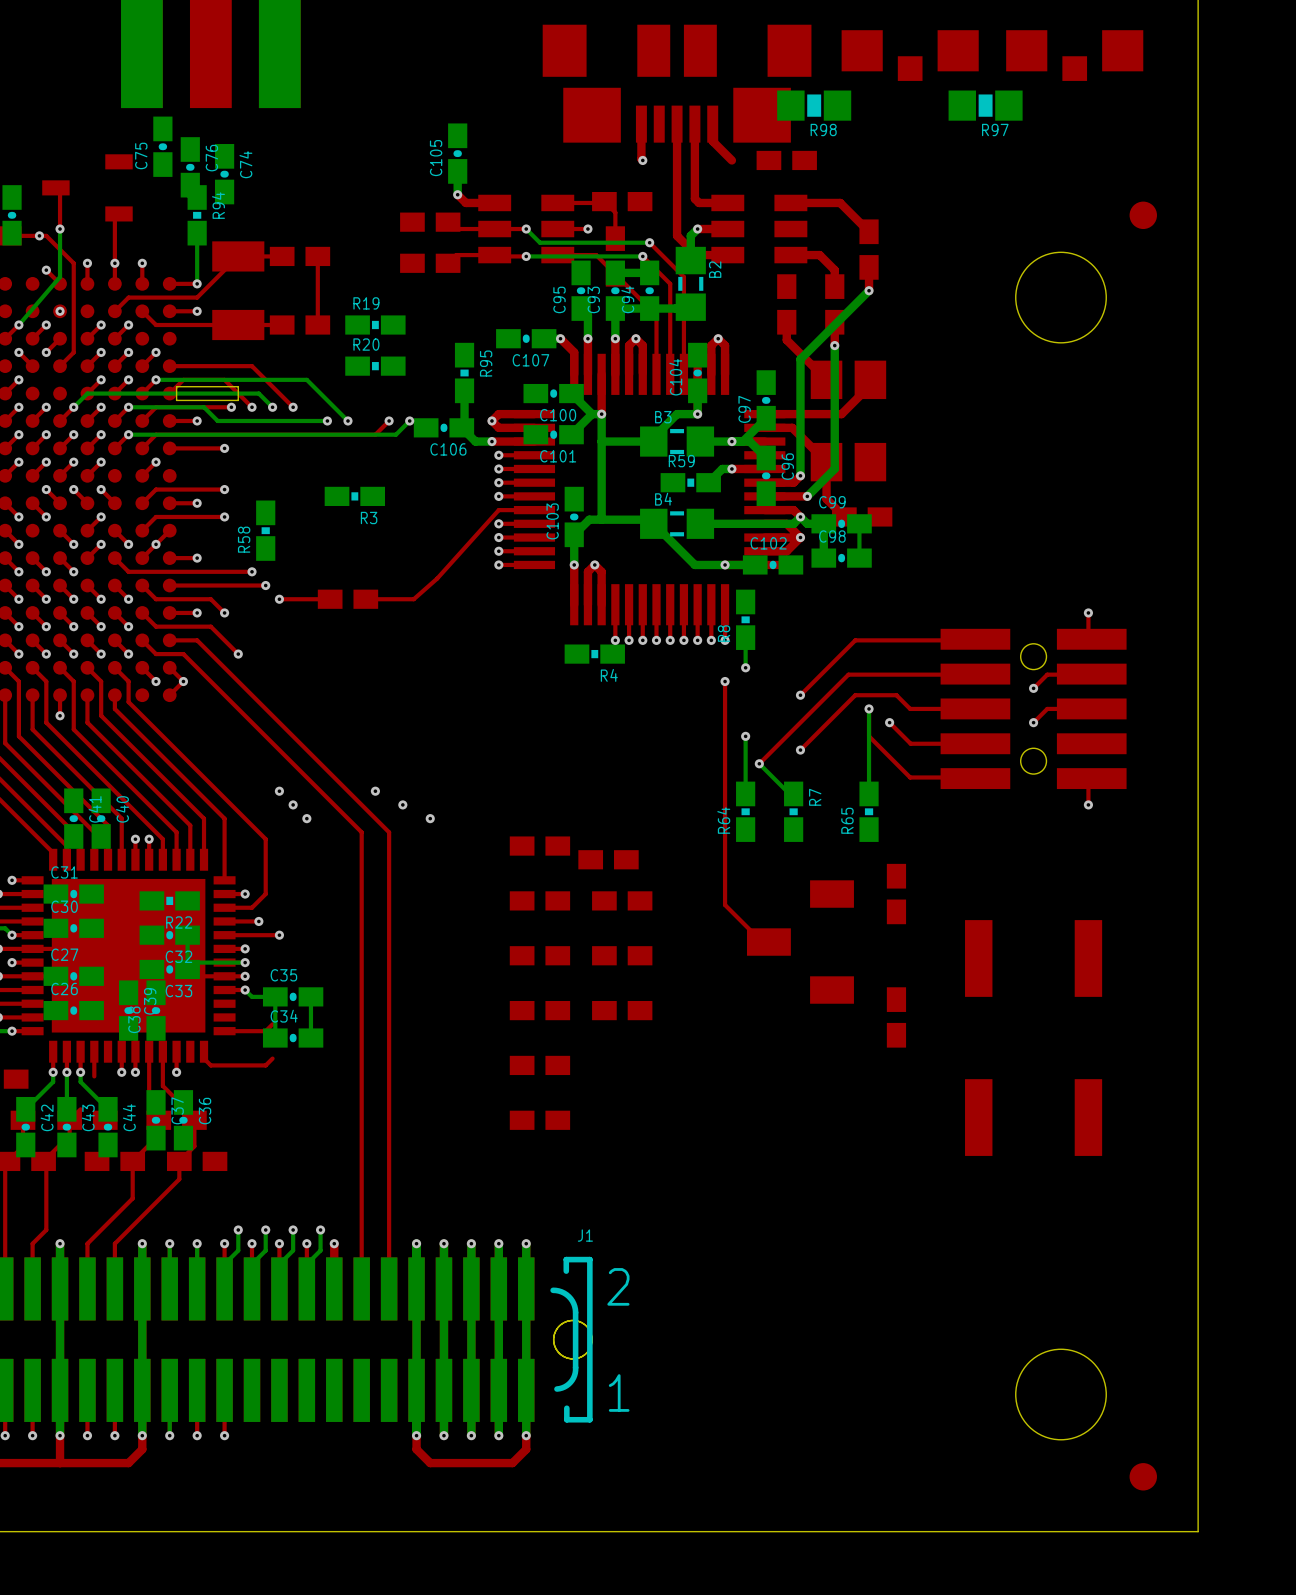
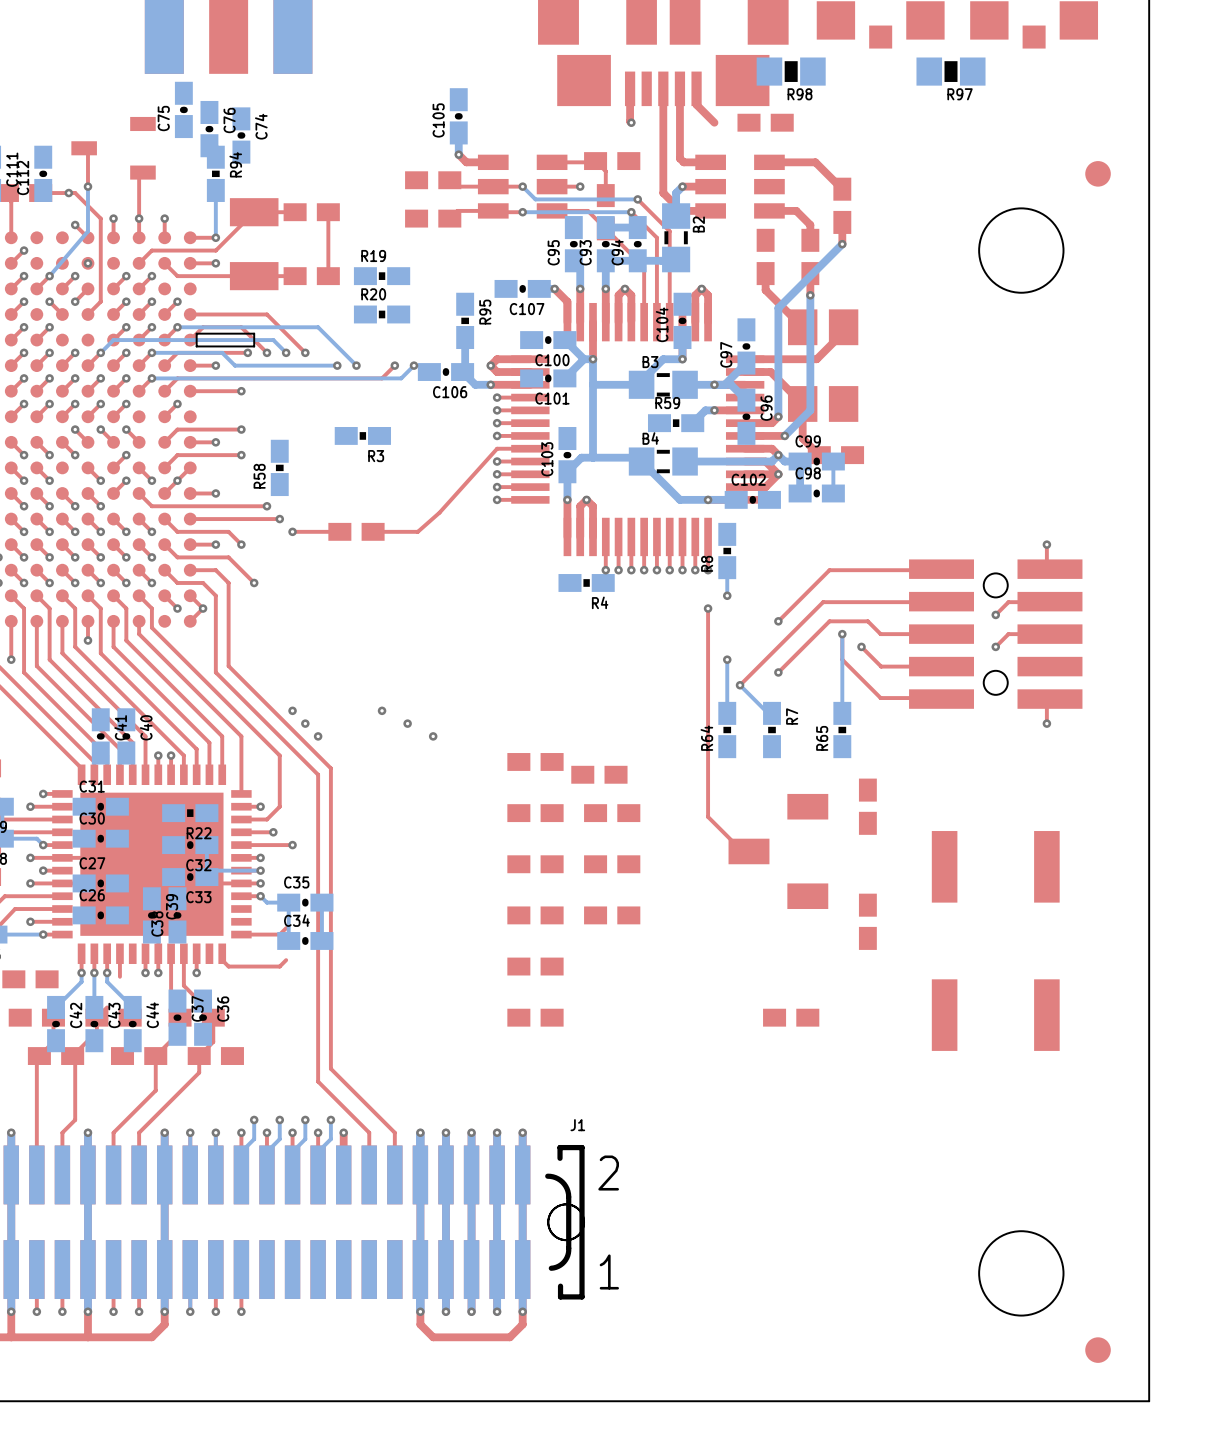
top track: (210, 654) (389, 832) (389, 1243) -> (228, 582) (228, 666) (330, 768) (330, 1068) (394, 1132)
top track: (197, 667) (361, 832) (361, 1243) -> (215, 595) (215, 672) (318, 774) (318, 1081) (369, 1132)
part: none -> (791, 1017)

